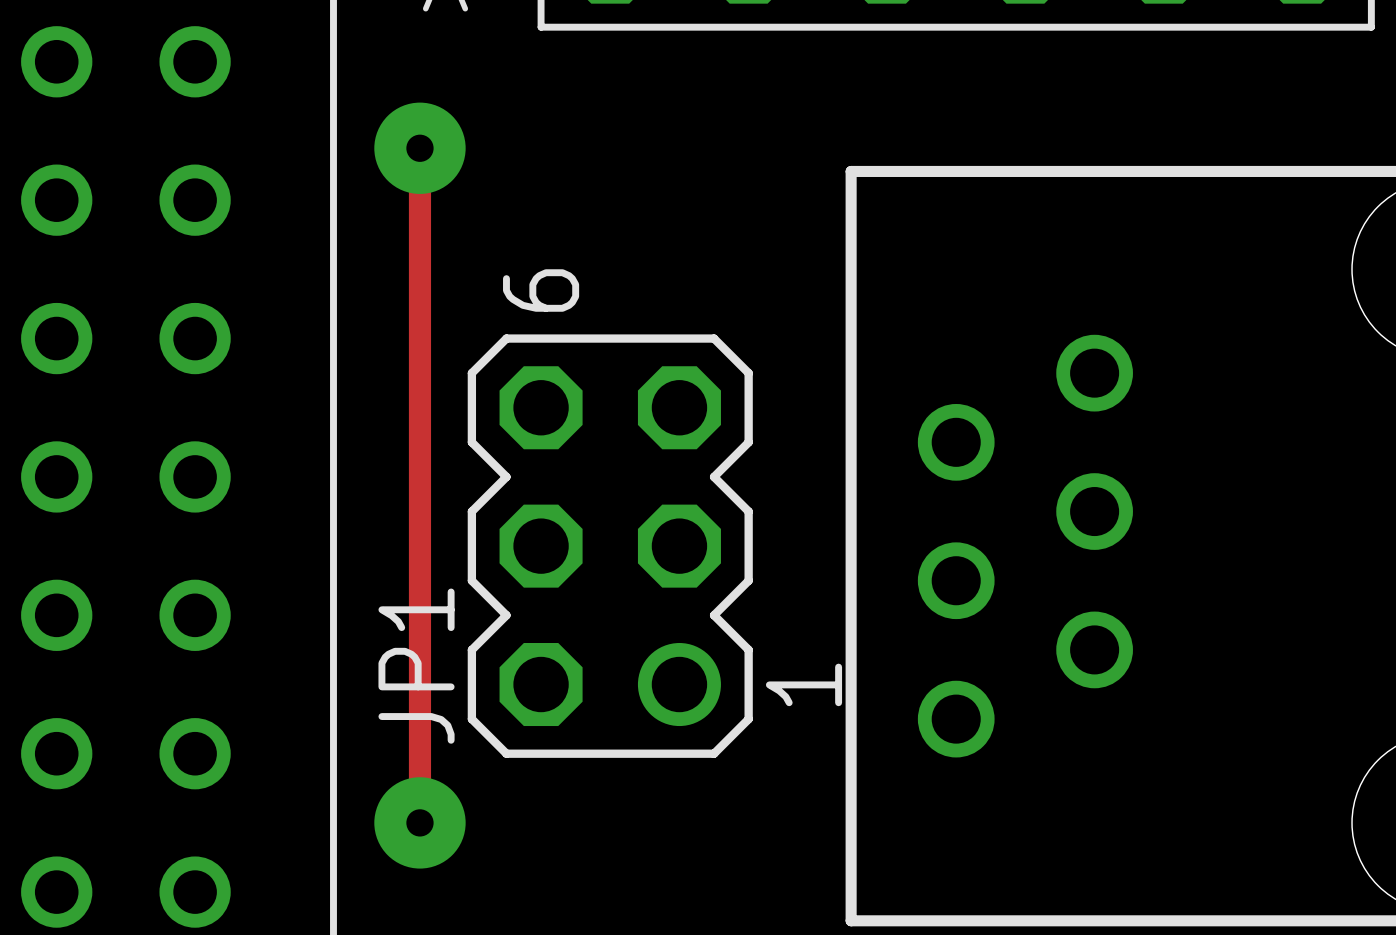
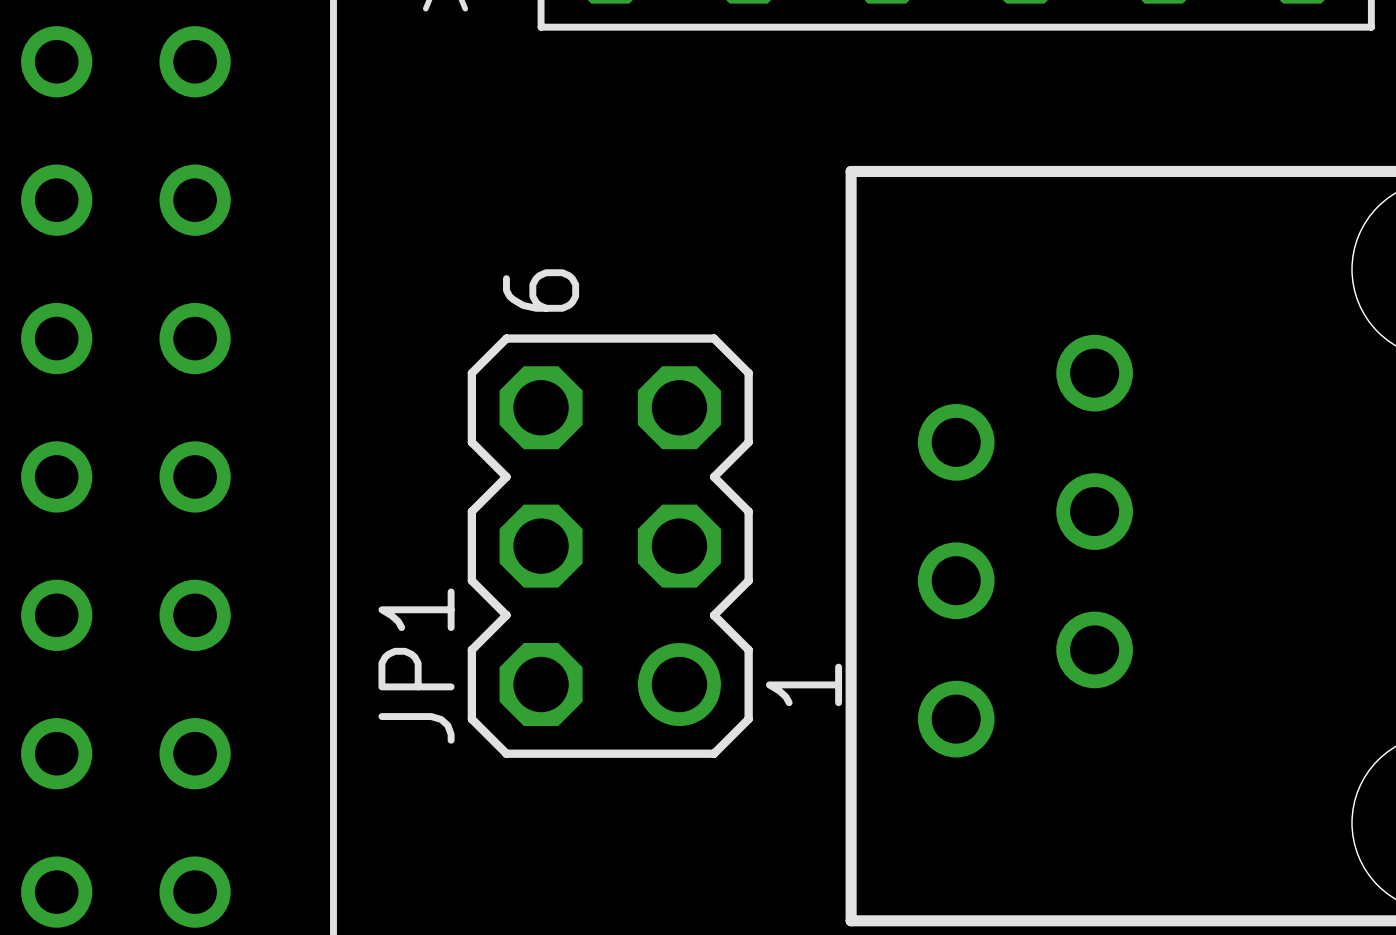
track: (419, 148) (419, 822) -> none
via: (419, 148) -> none
via: (419, 822) -> none

